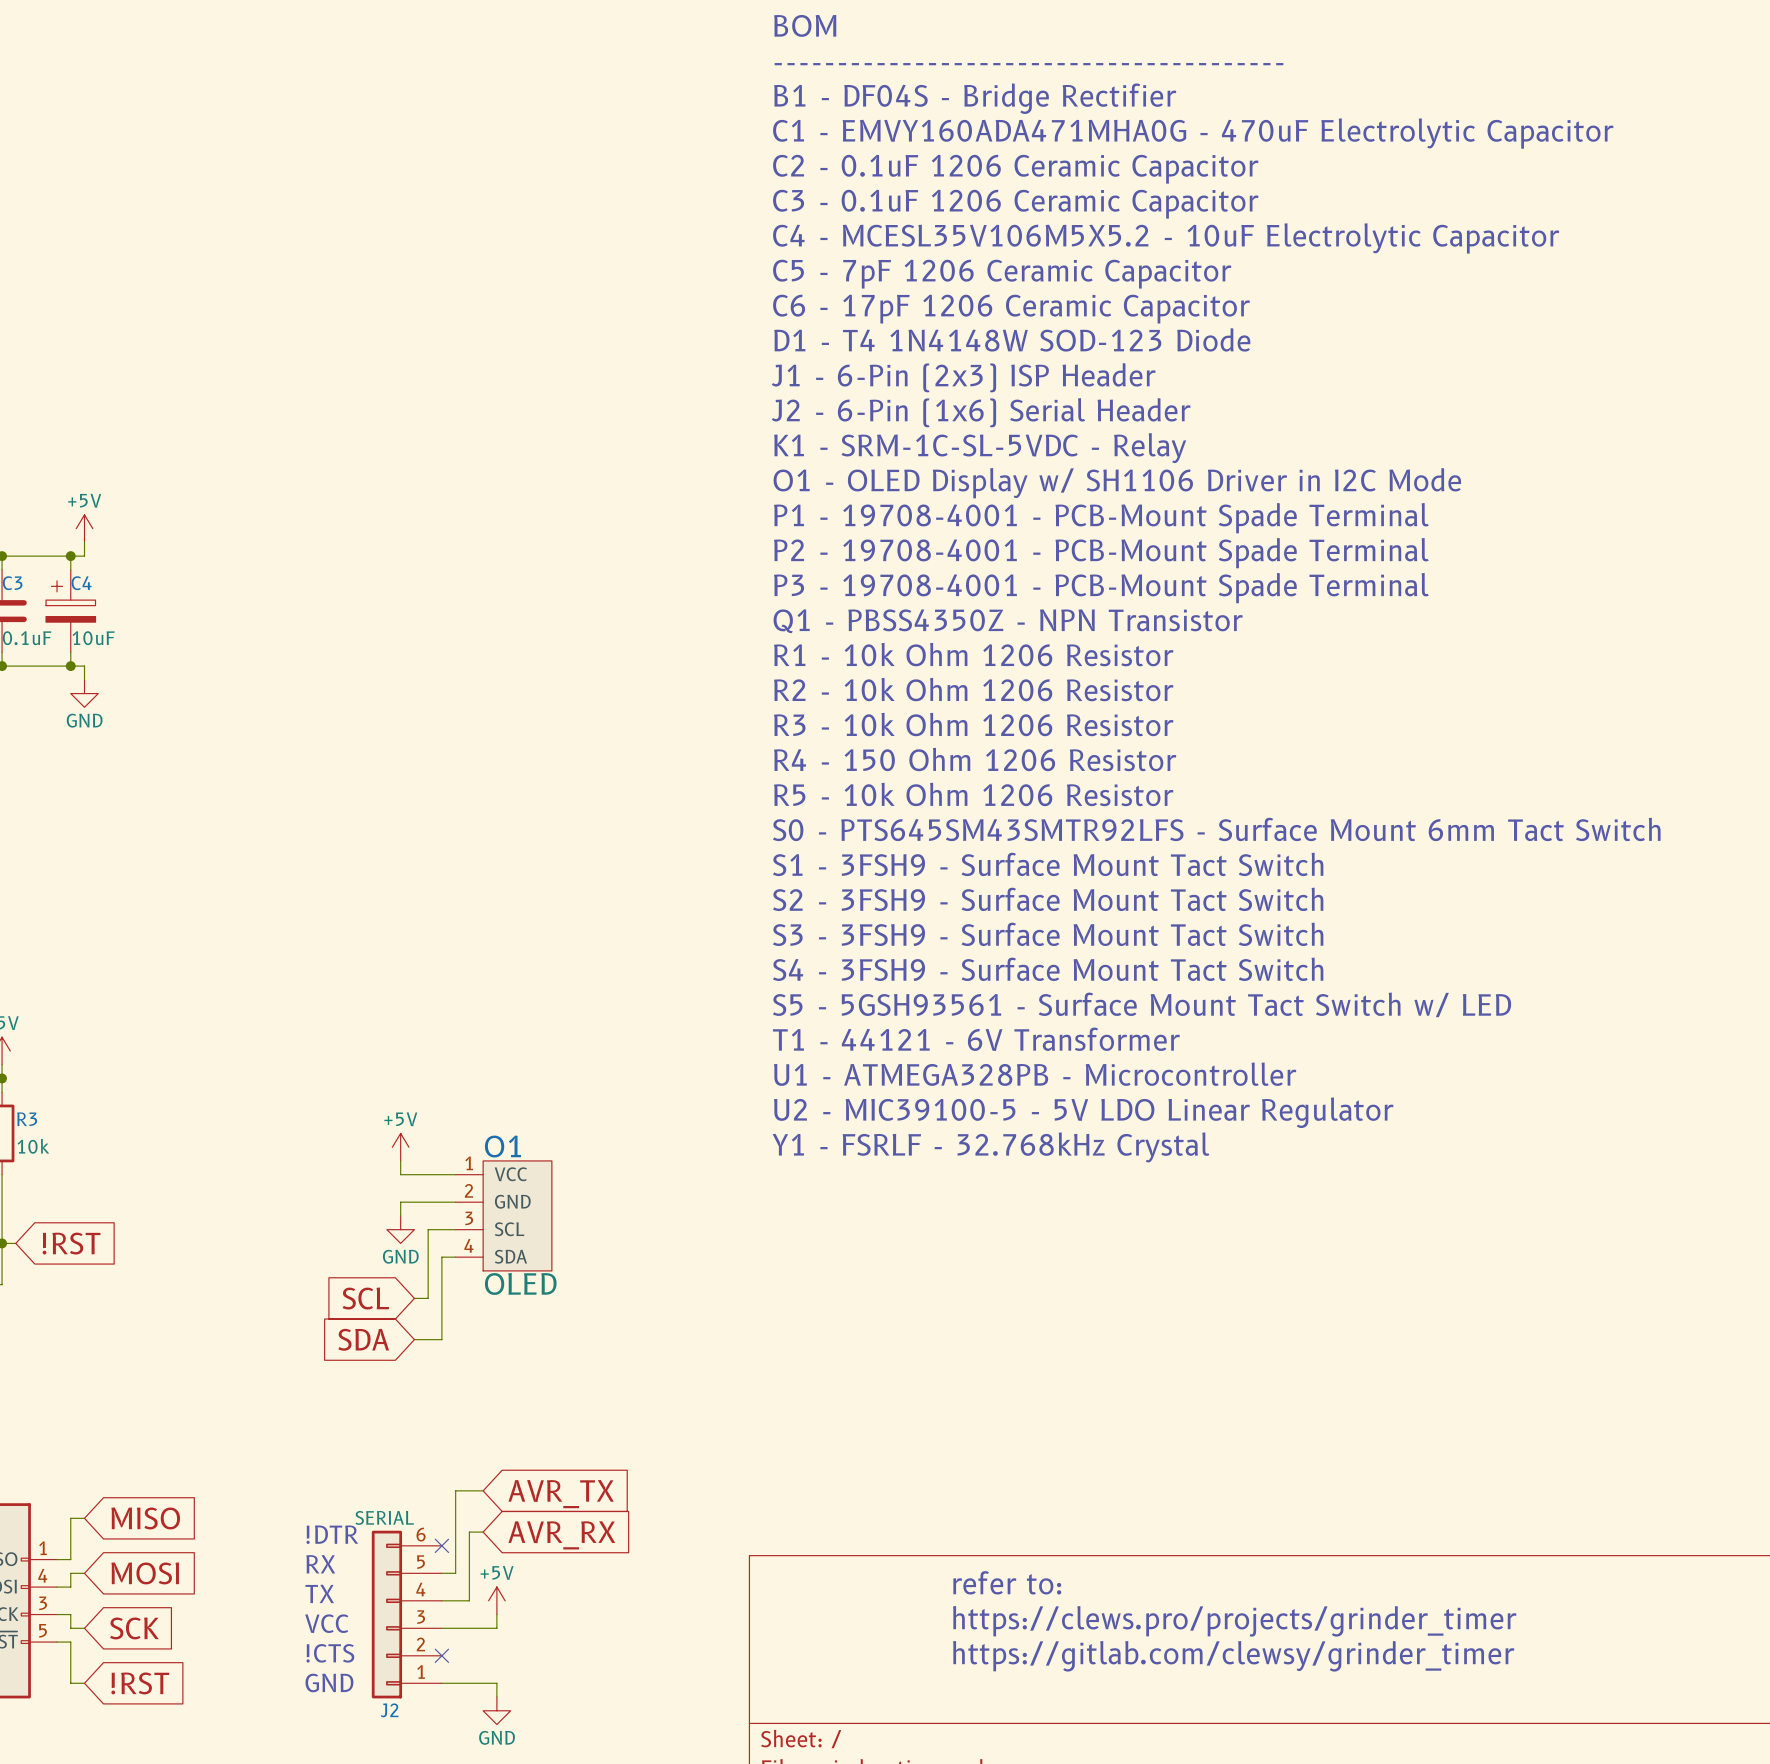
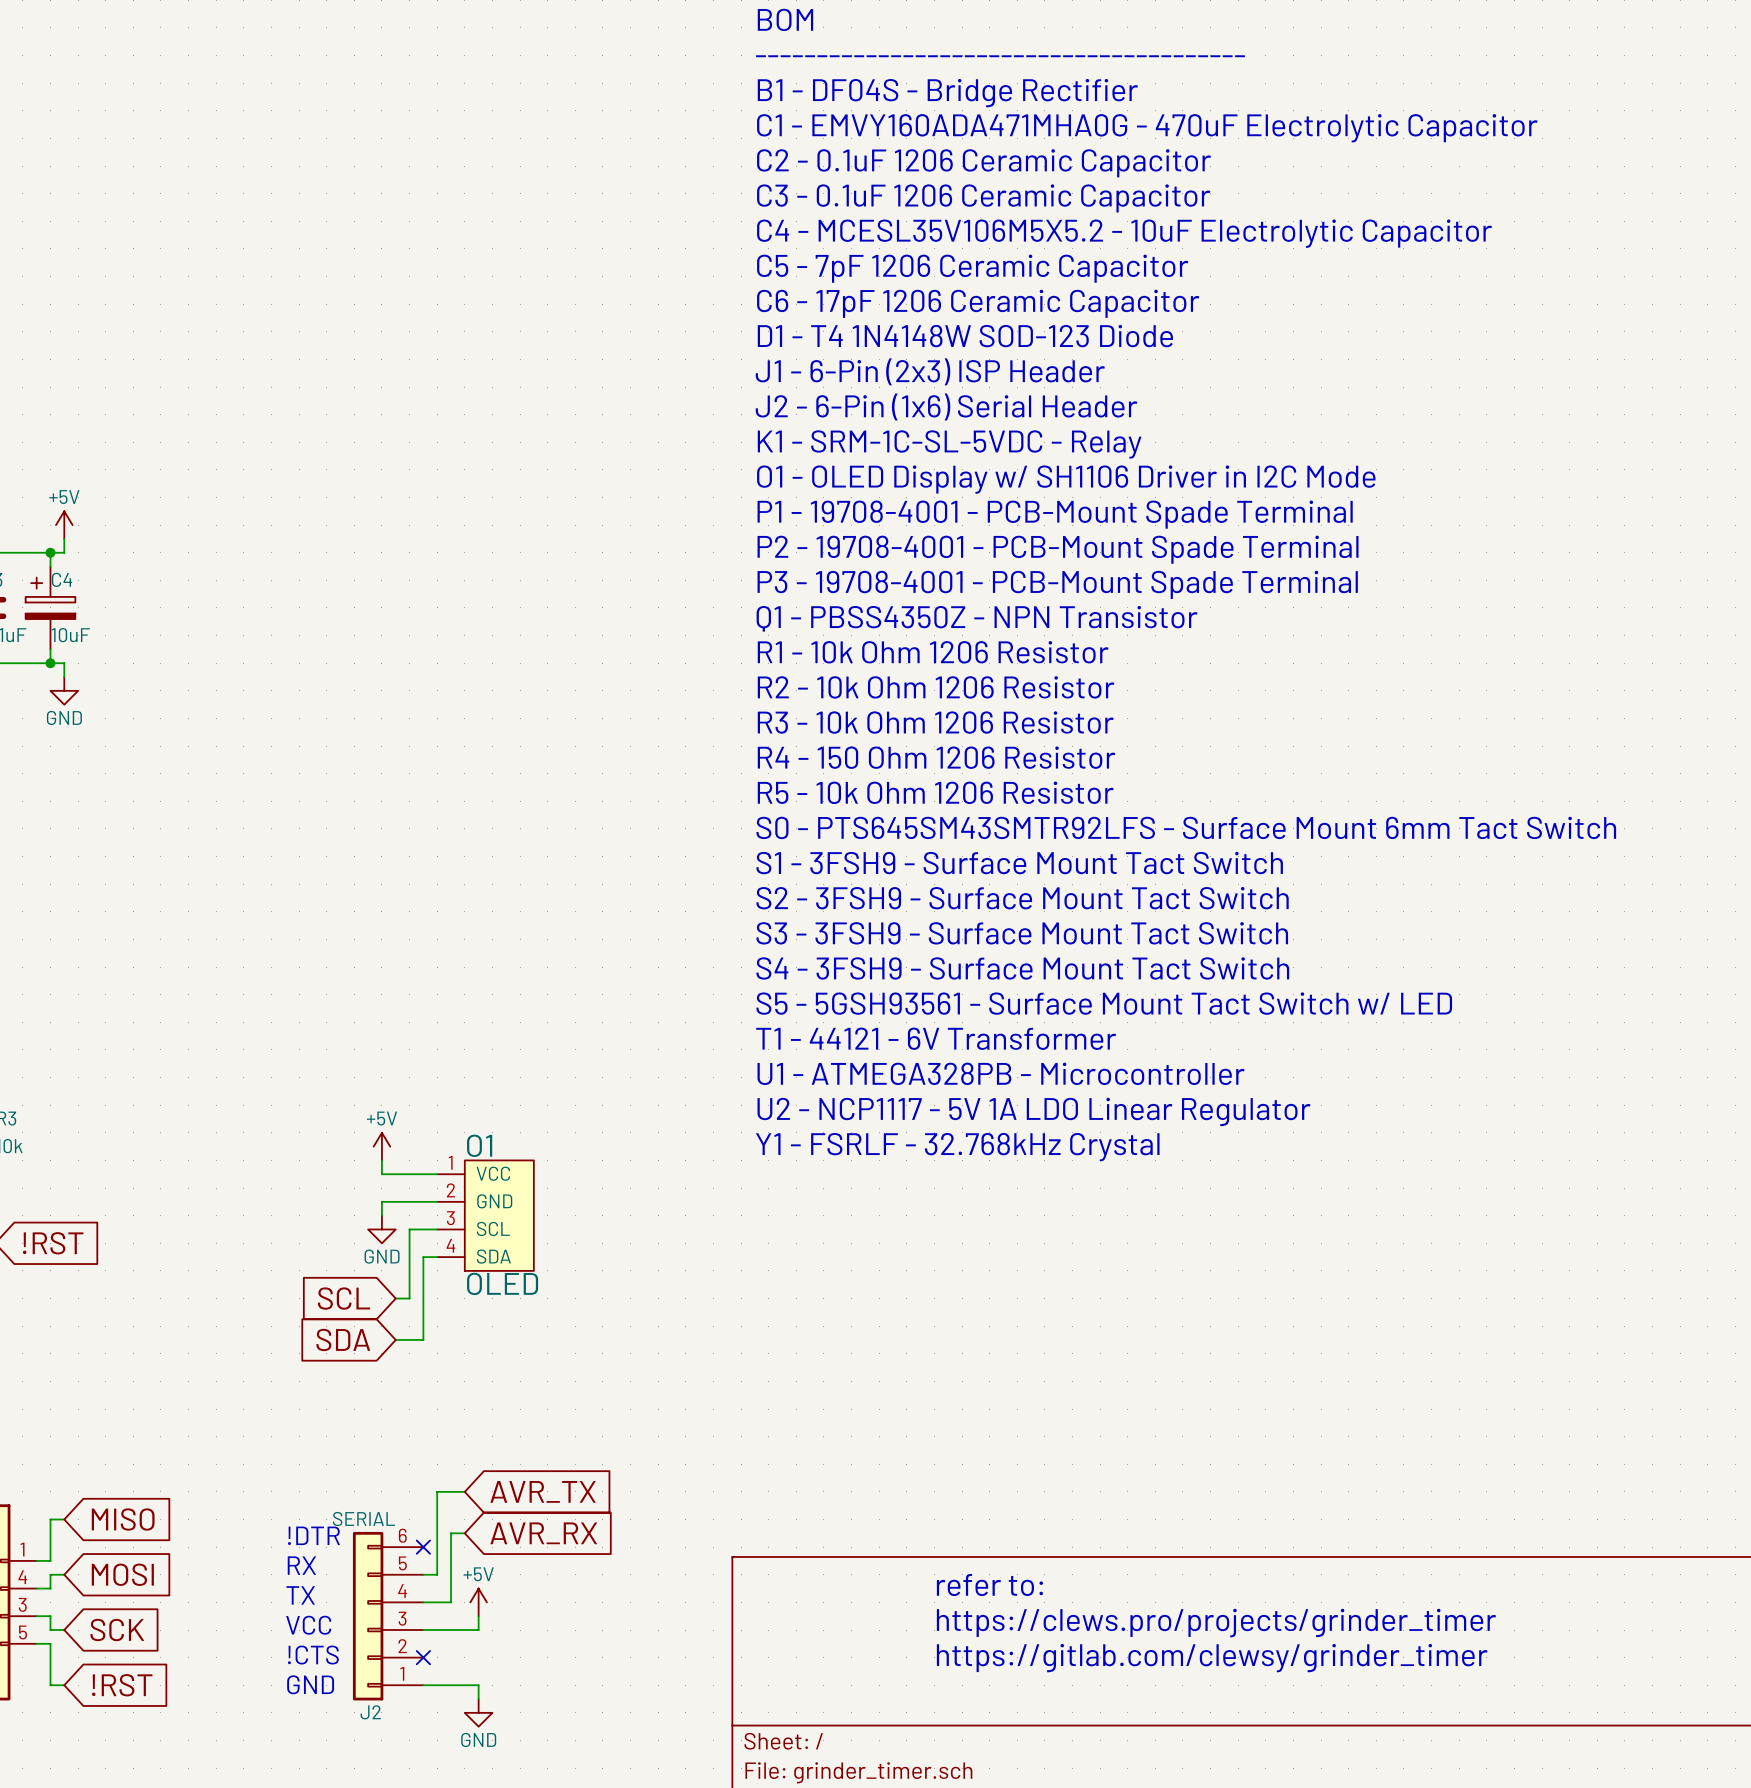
text: U2 - MIC39100-5 - 5V LDO Linear Regulator (1083, 1112) -> U2 - NCP1117 - 5V 1A LDO Linear Regulator (1033, 1111)

